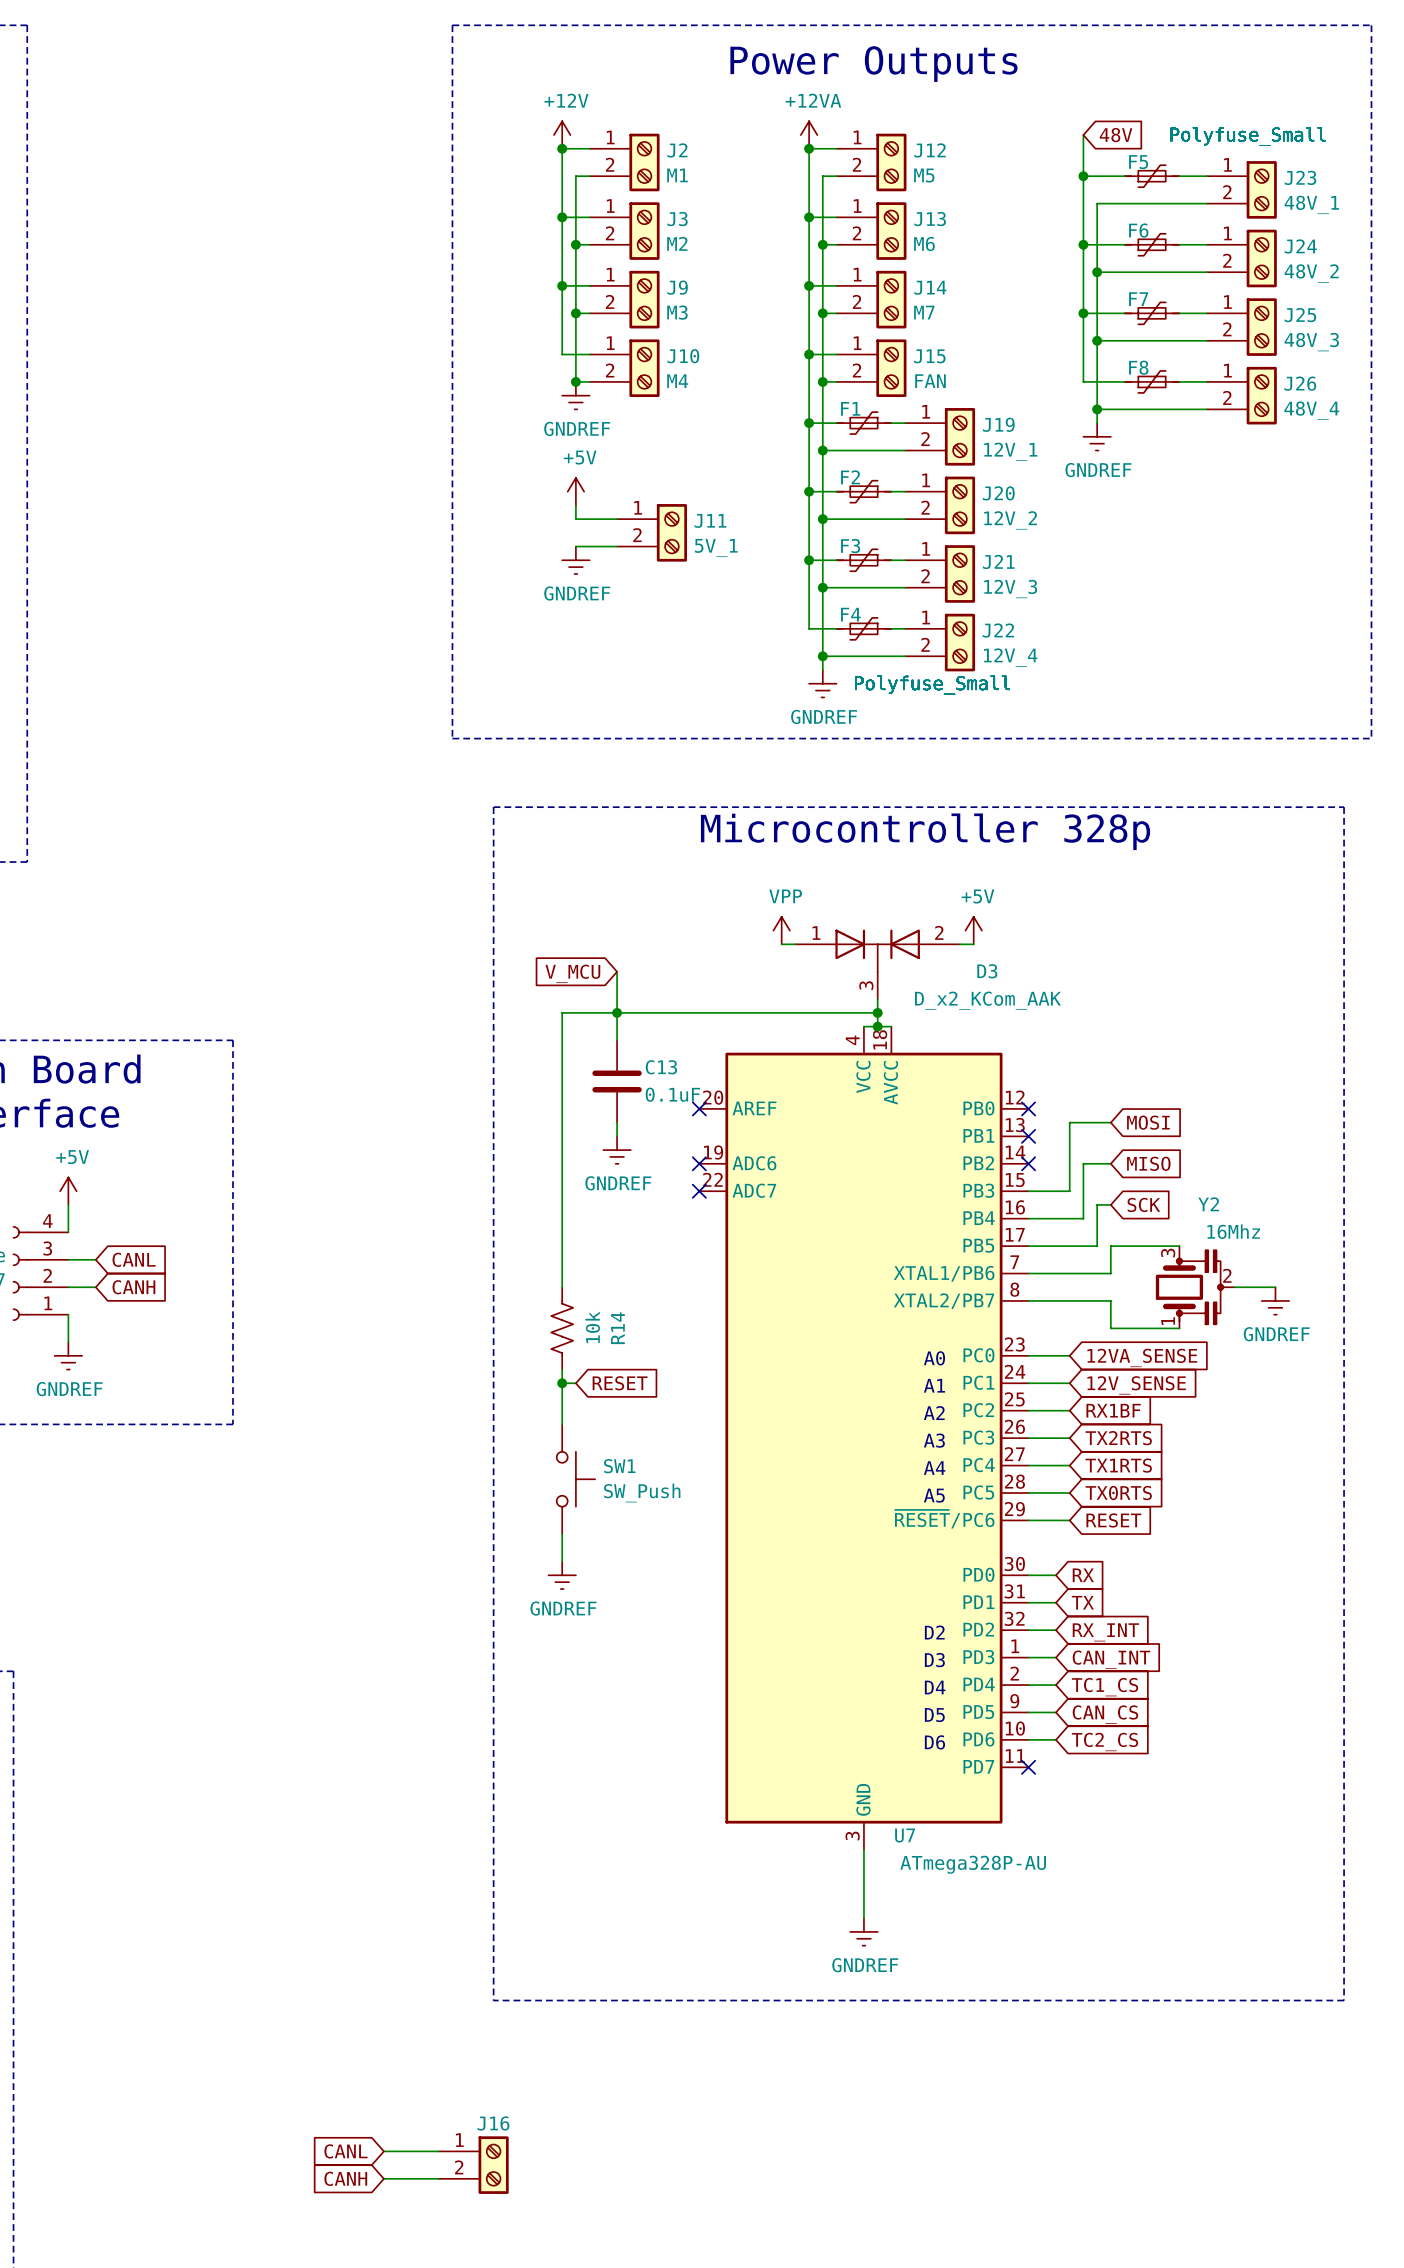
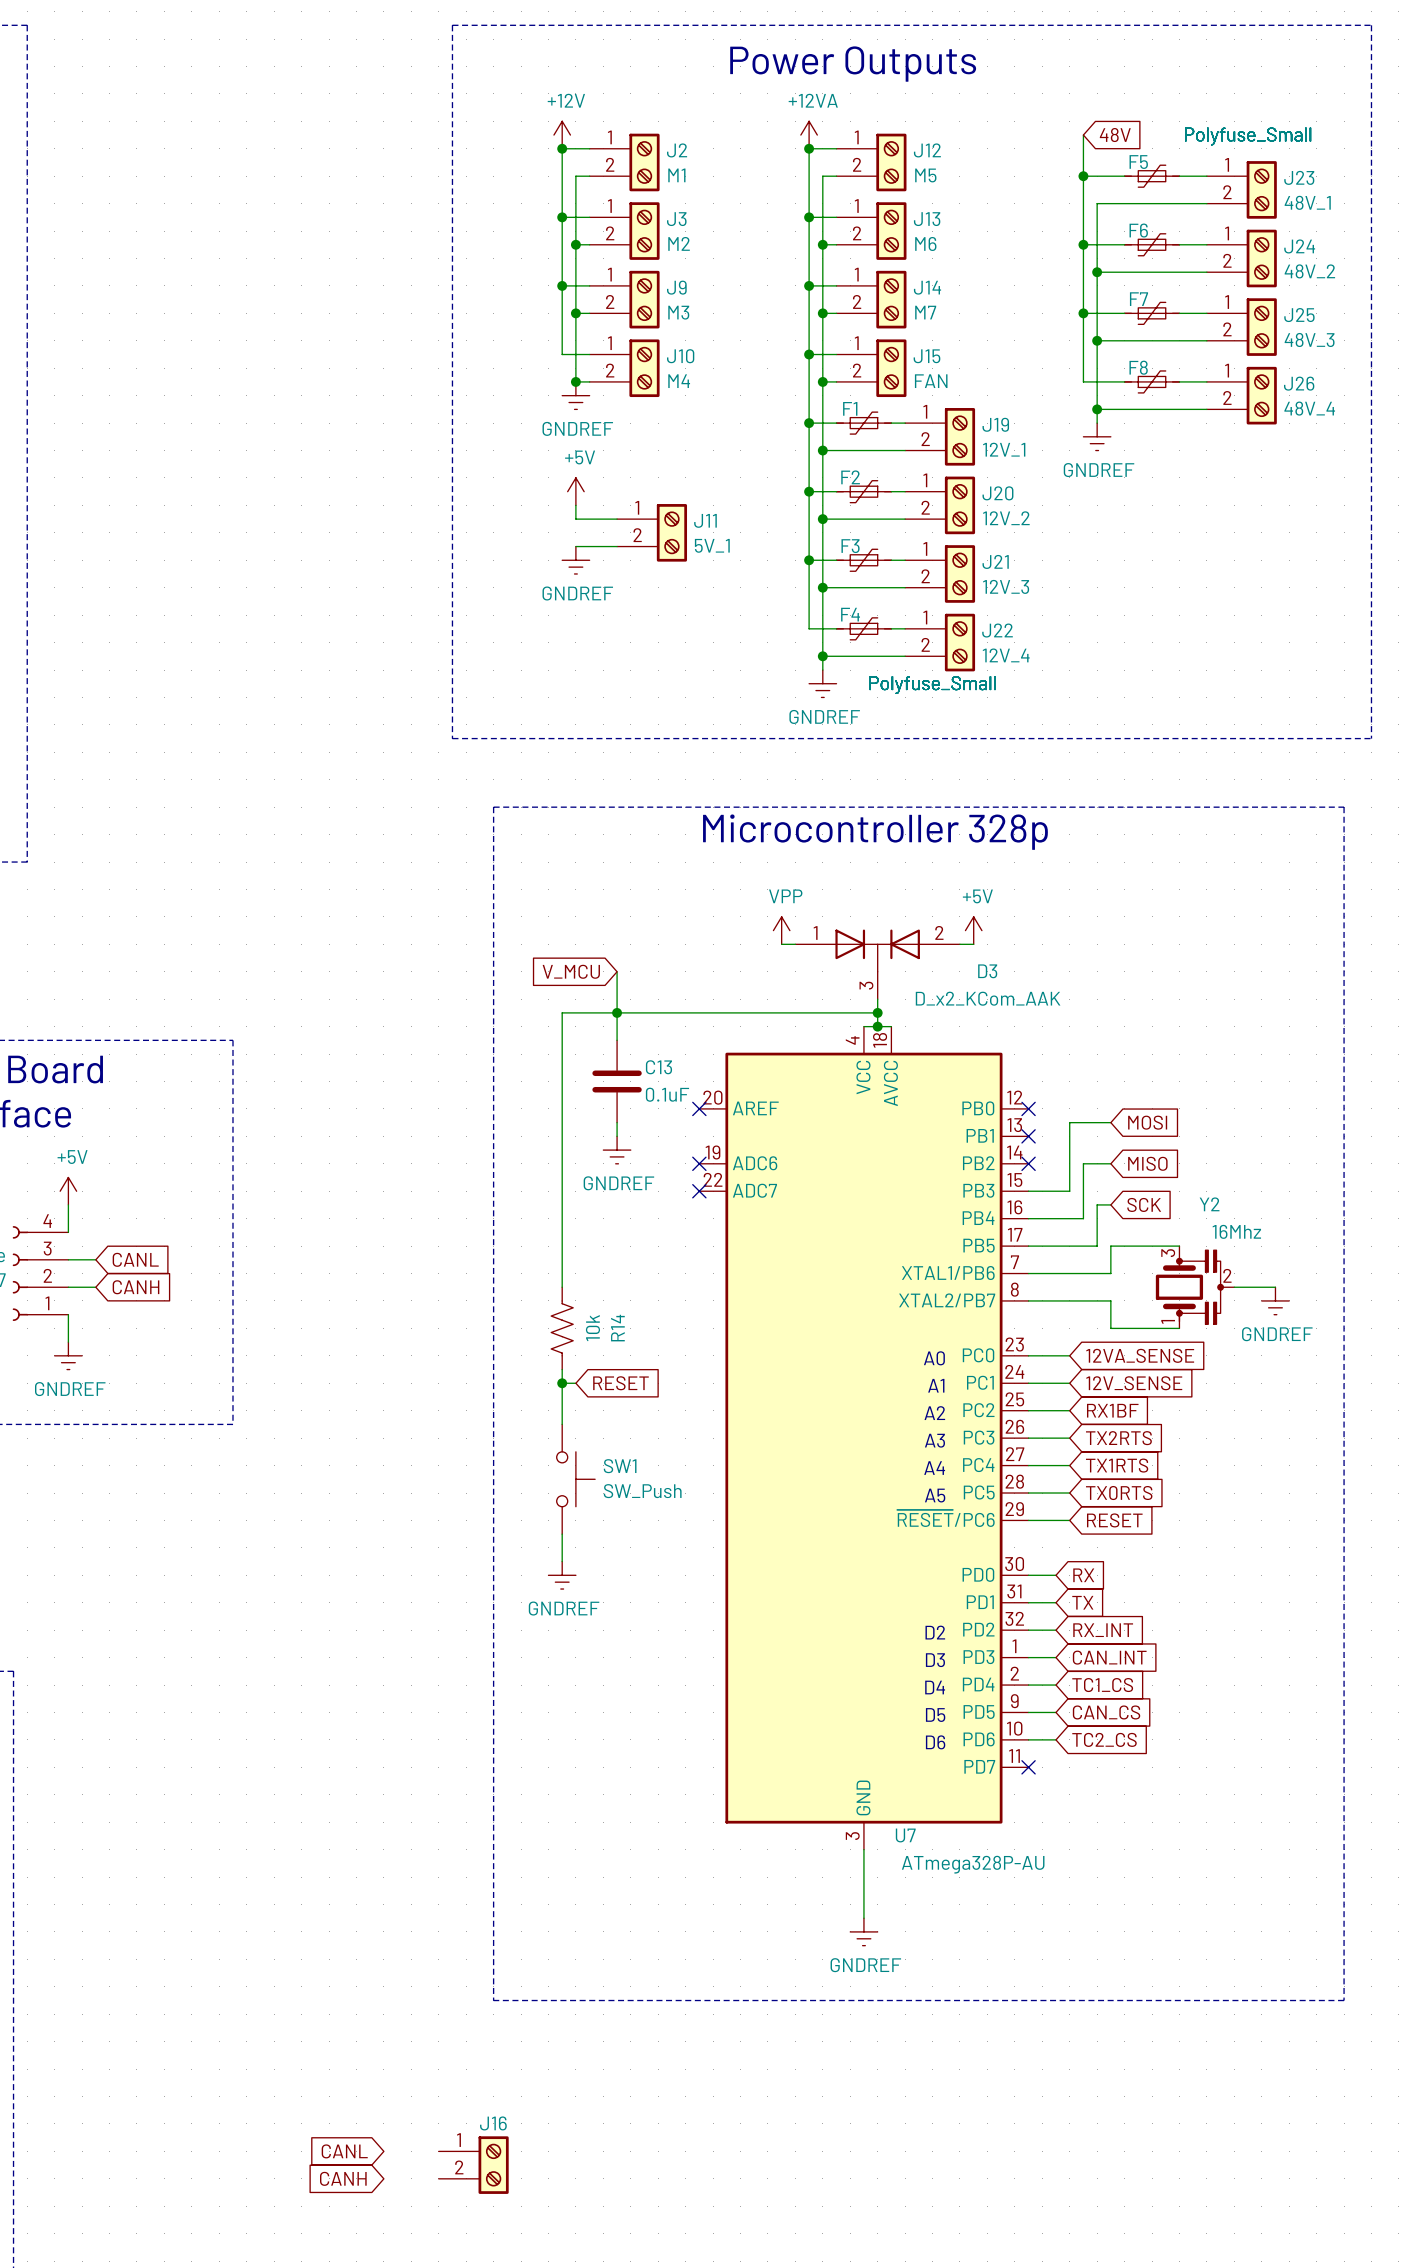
wire: (383, 2151) (438, 2151) -> none
wire: (383, 2178) (438, 2178) -> none

